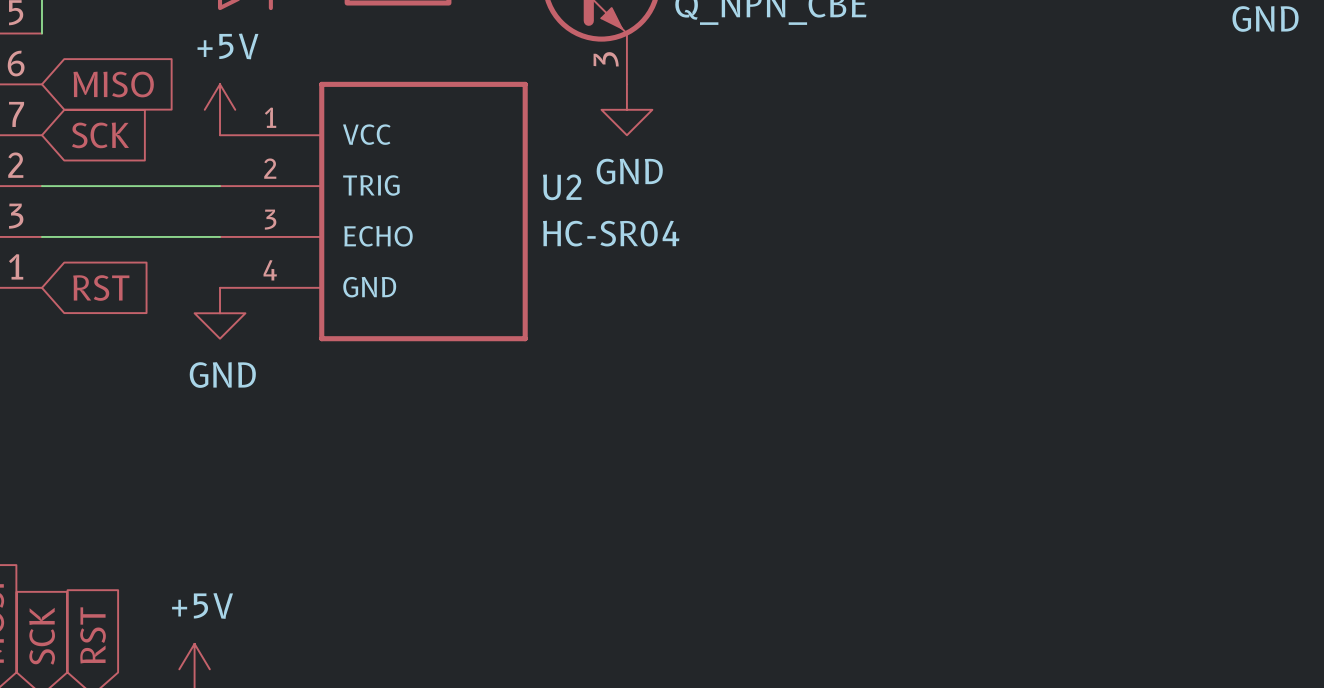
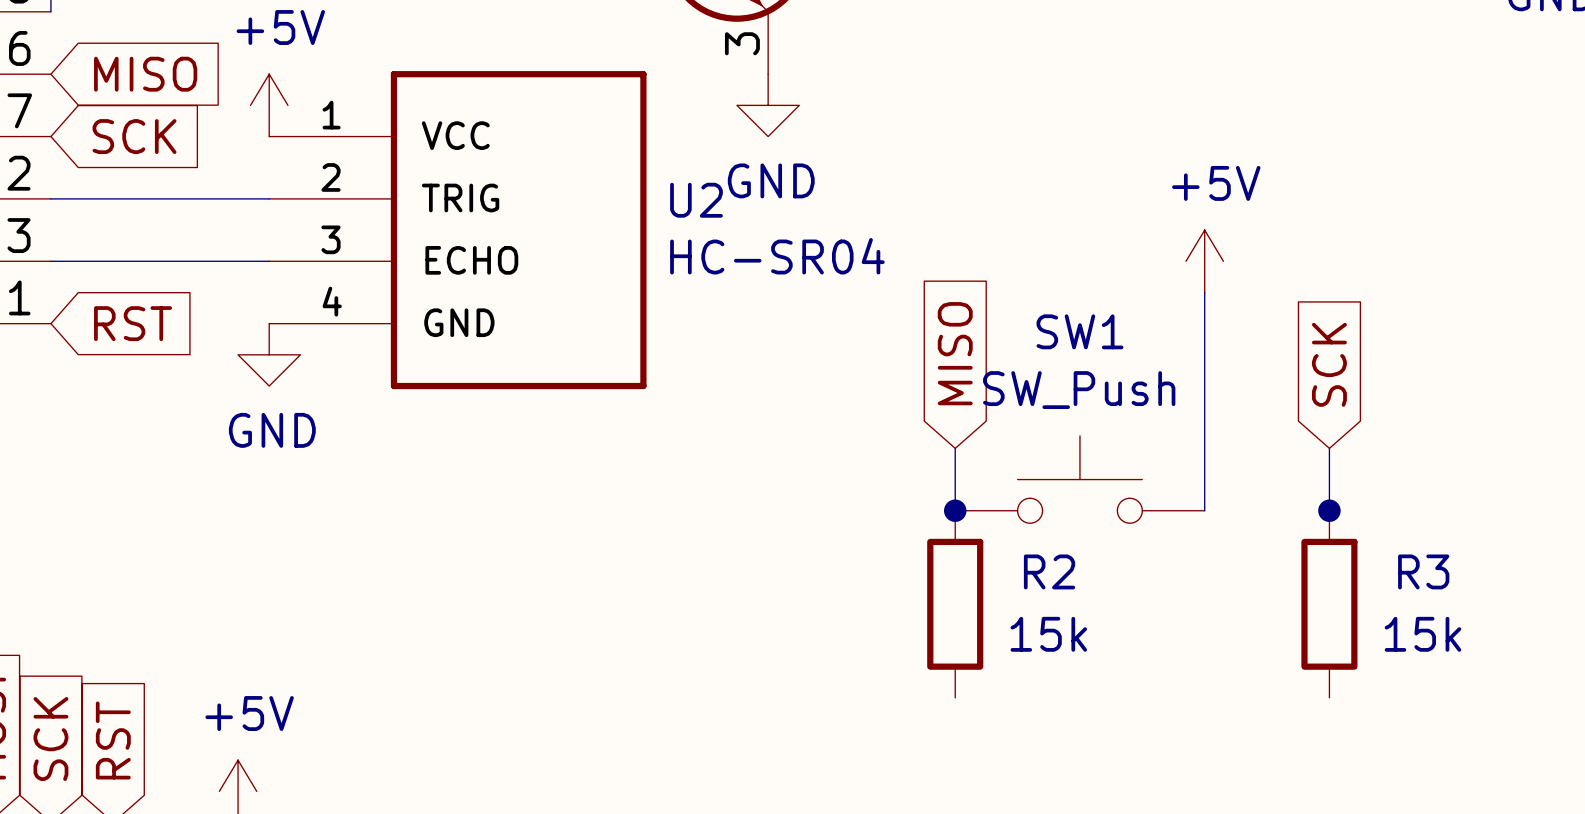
power symbol: none -> +5V (1204, 261)
wire: none -> (1204, 292) (1204, 510)
global label: none -> MISO (955, 353)
global label: none -> SCK (1329, 364)
wire: none -> (955, 448) (955, 510)
wire: none -> (1329, 448) (1329, 510)
SW1: none -> SW_Push (1079, 479)
junction: none -> (955, 510)
junction: none -> (1329, 510)
R2: none -> 15k (955, 604)
R3: none -> 15k (1329, 604)

